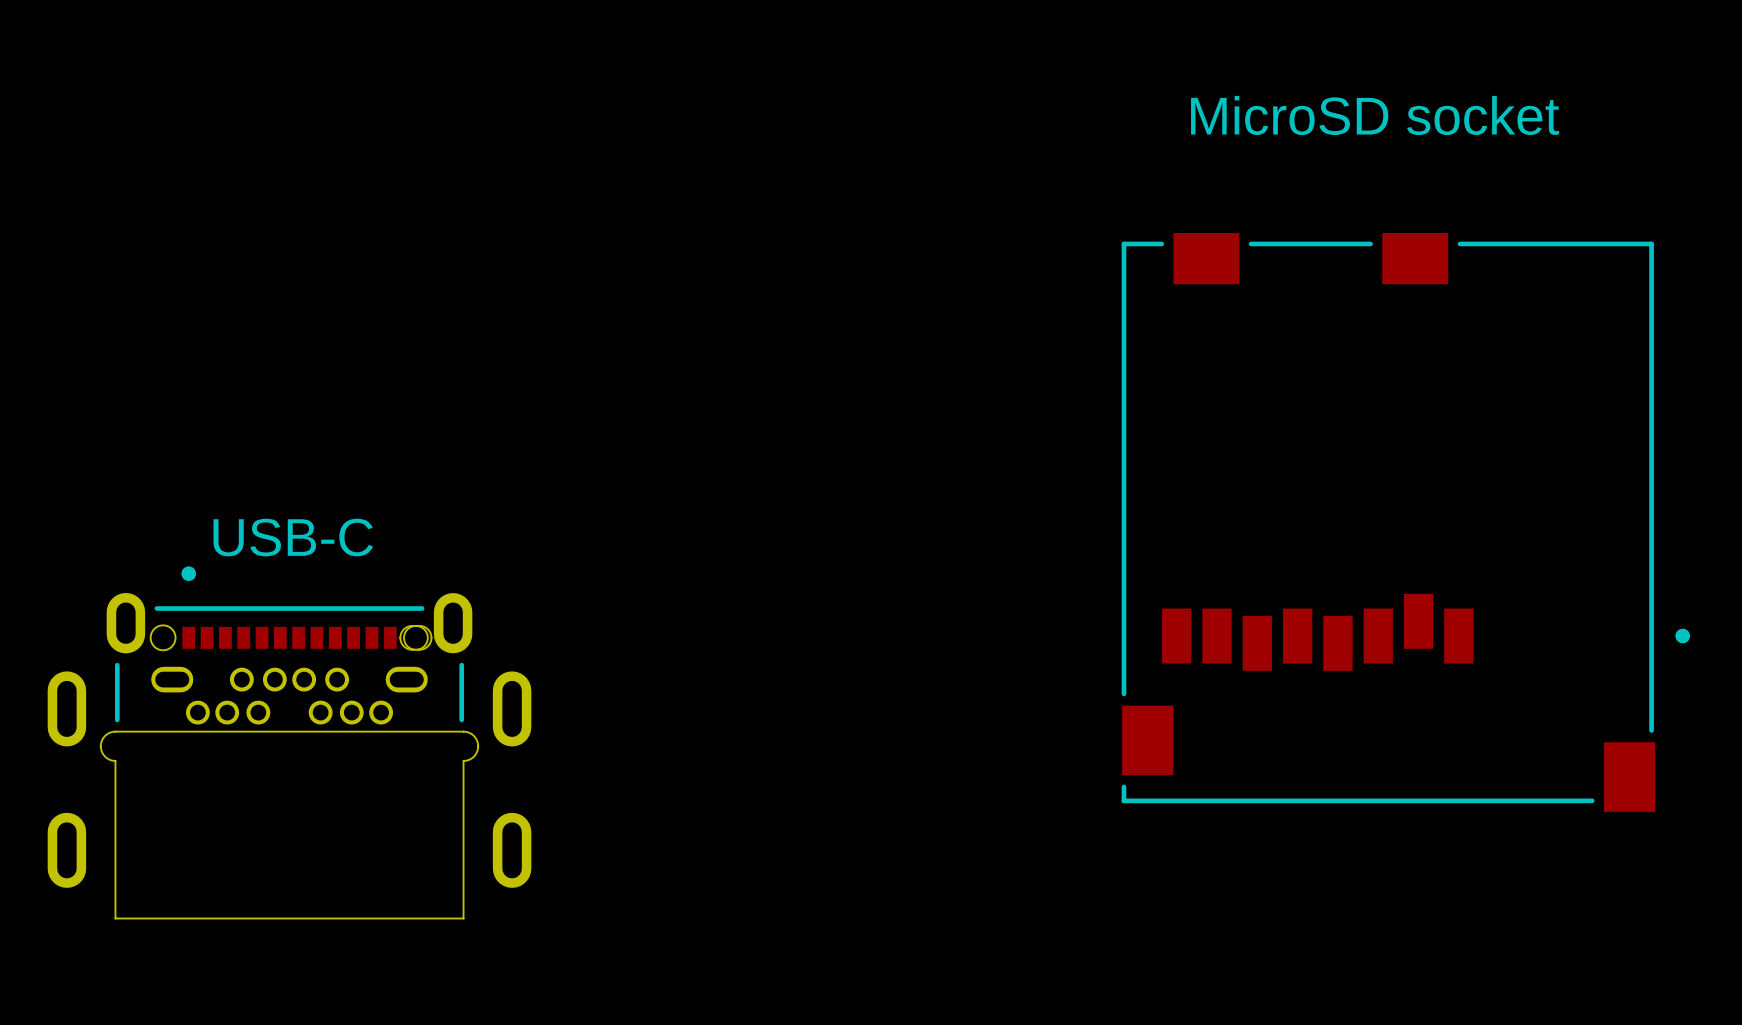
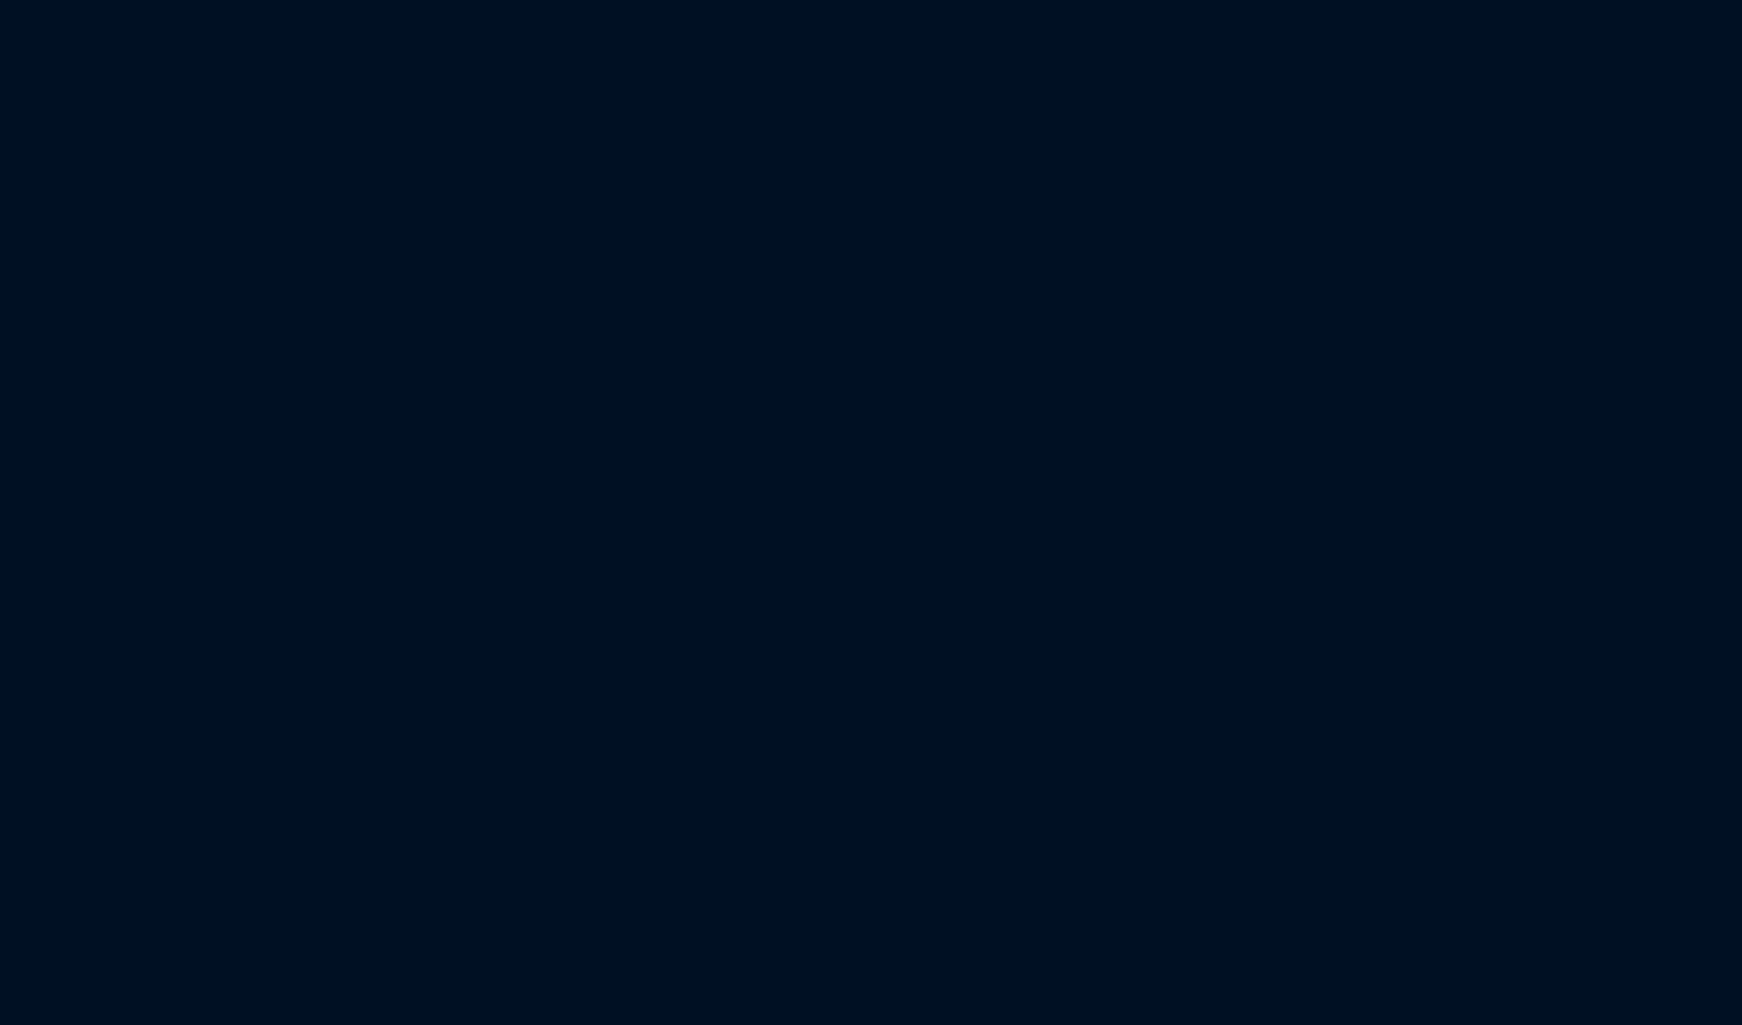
MicroSD socket: (1405, 522) -> none
USB-C: (289, 742) -> none

